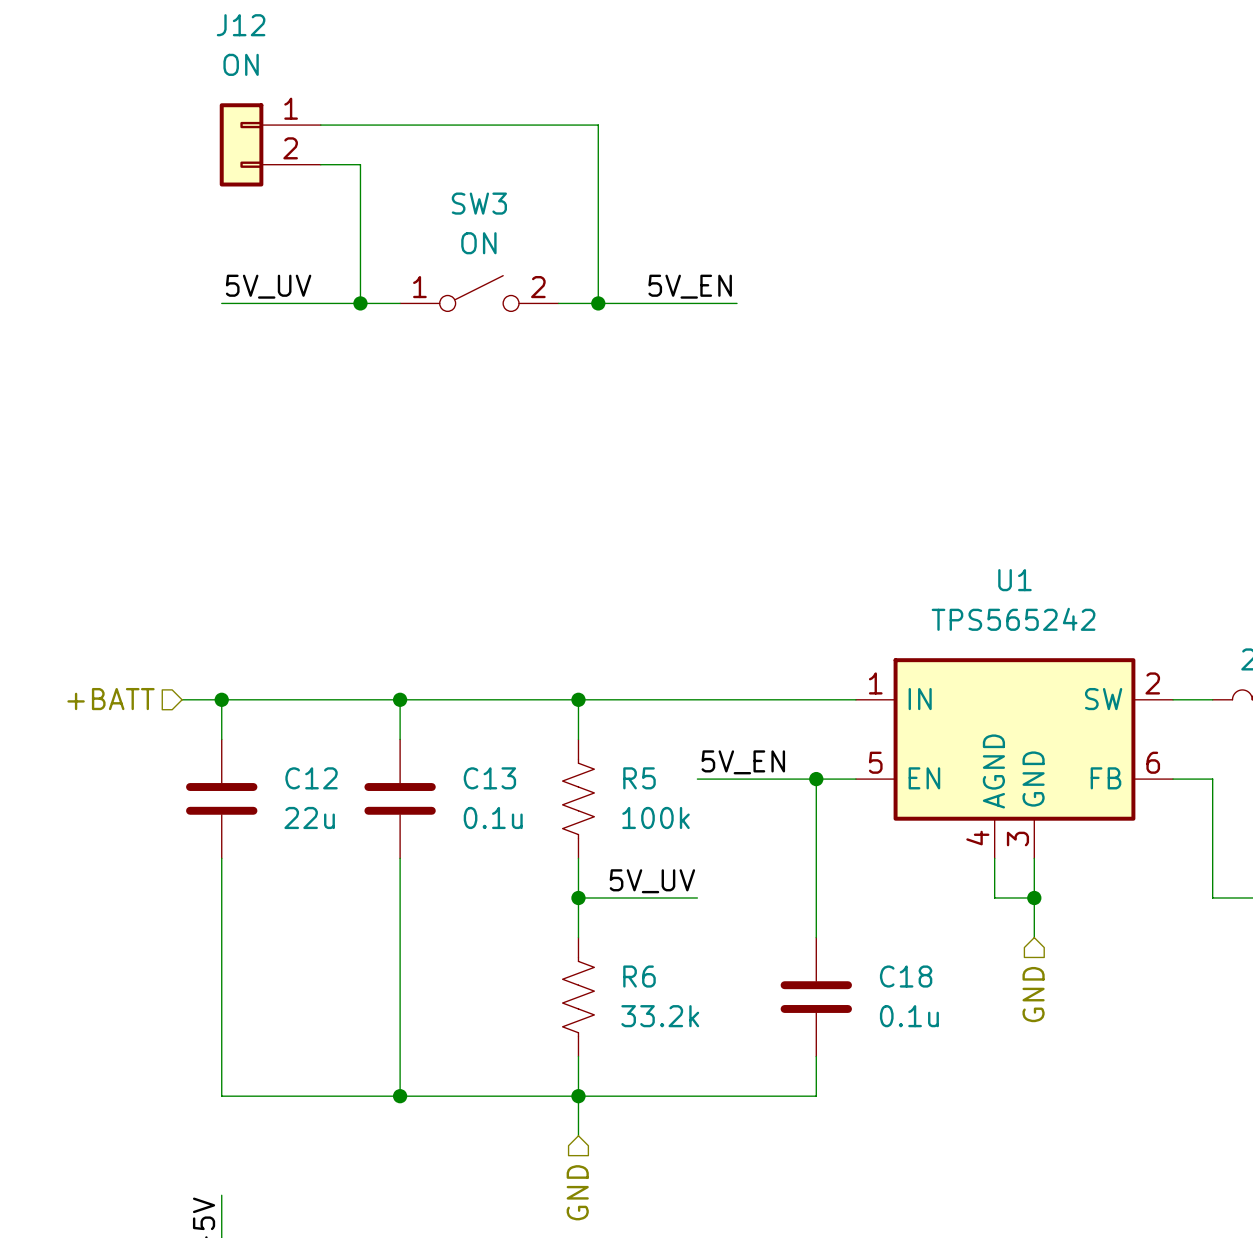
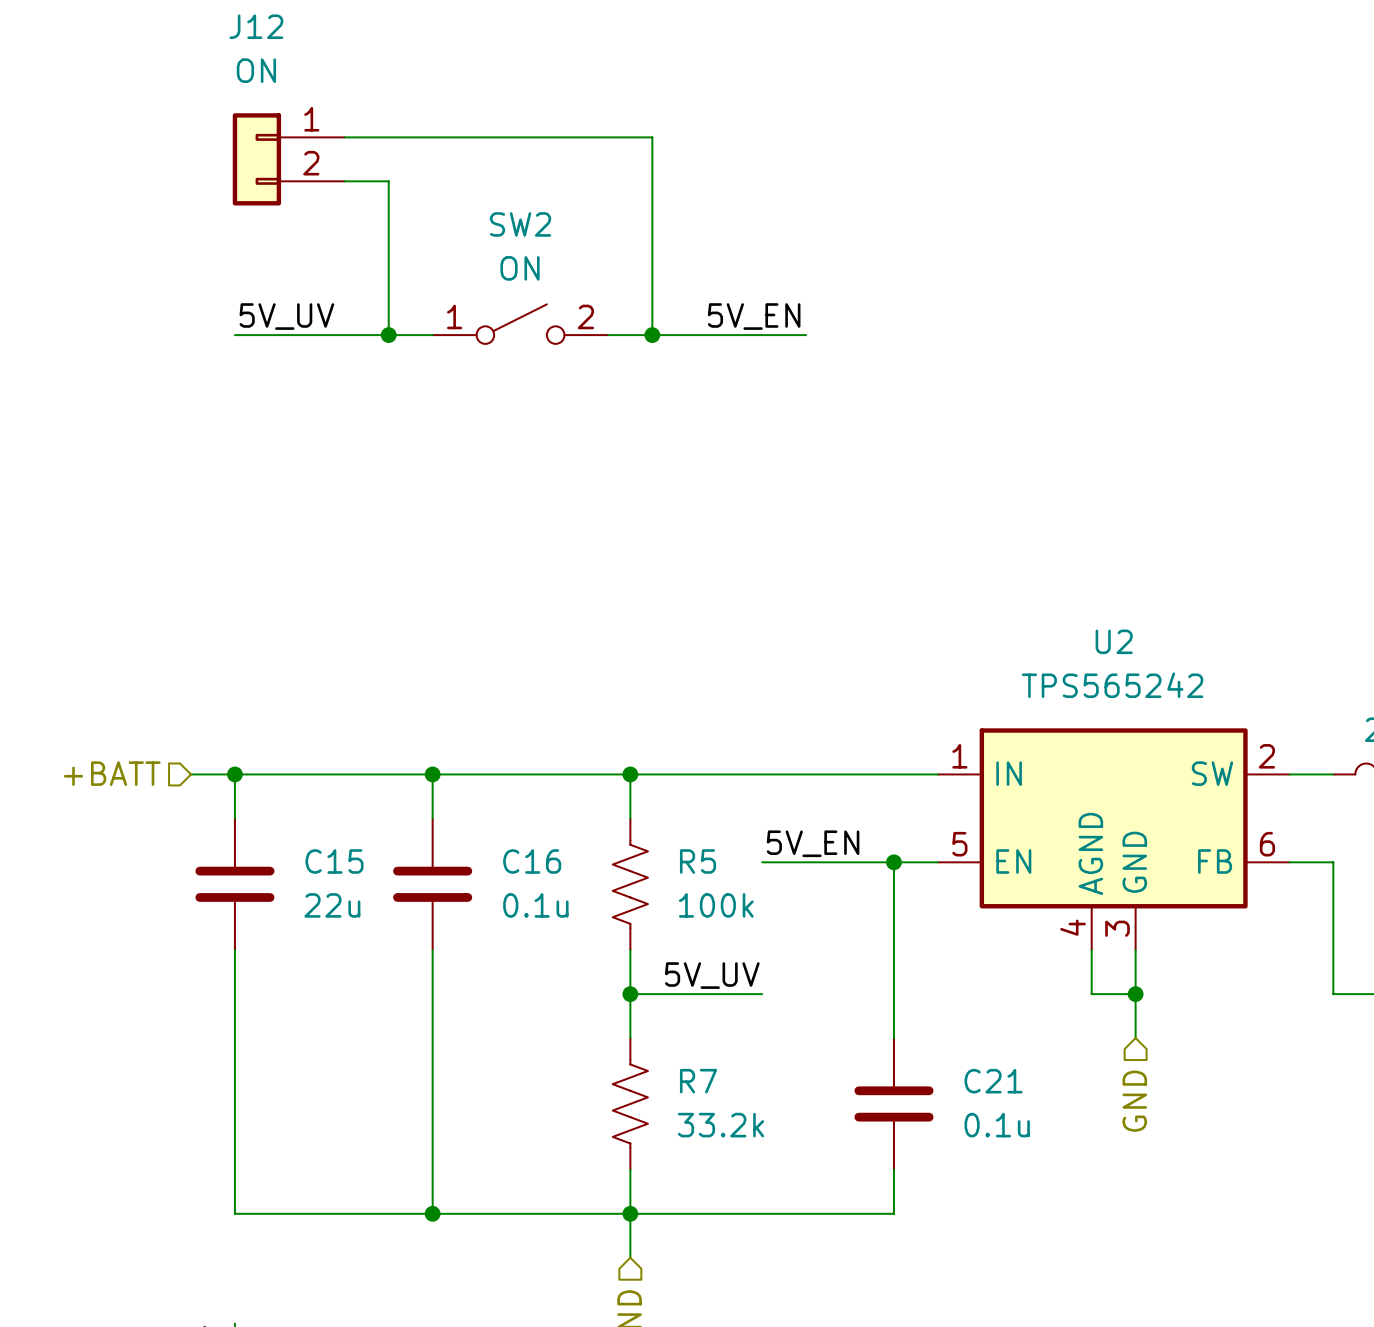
SW3 name: SW3 (479, 203) -> SW2 (520, 224)
U1 name: U1 (1014, 580) -> U2 (1114, 641)
C12 name: C12 (311, 778) -> C15 (334, 861)
C13 name: C13 (489, 778) -> C16 (532, 861)
R6 name: R6 (639, 976) -> R7 (698, 1081)
C18 name: C18 (906, 976) -> C21 (993, 1081)

